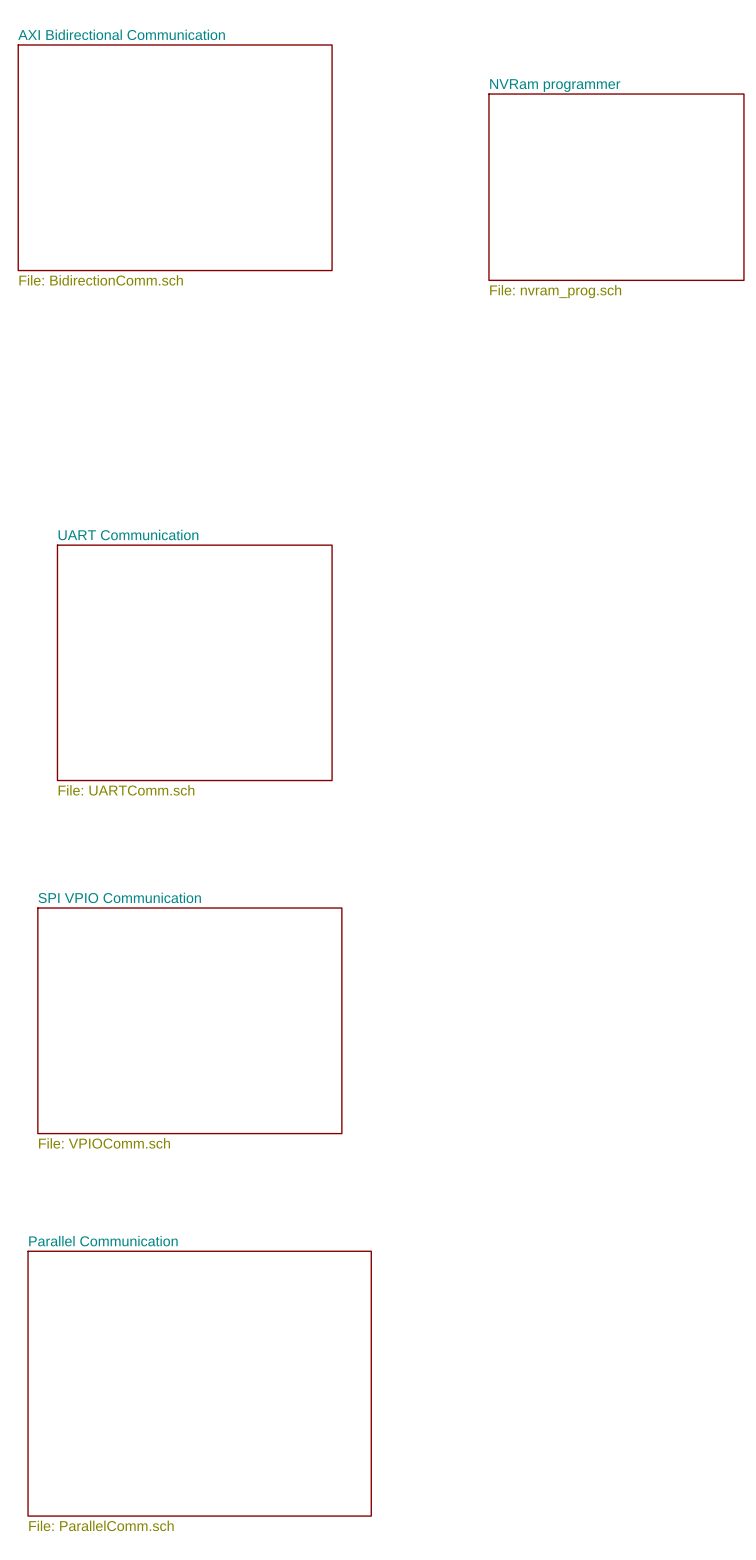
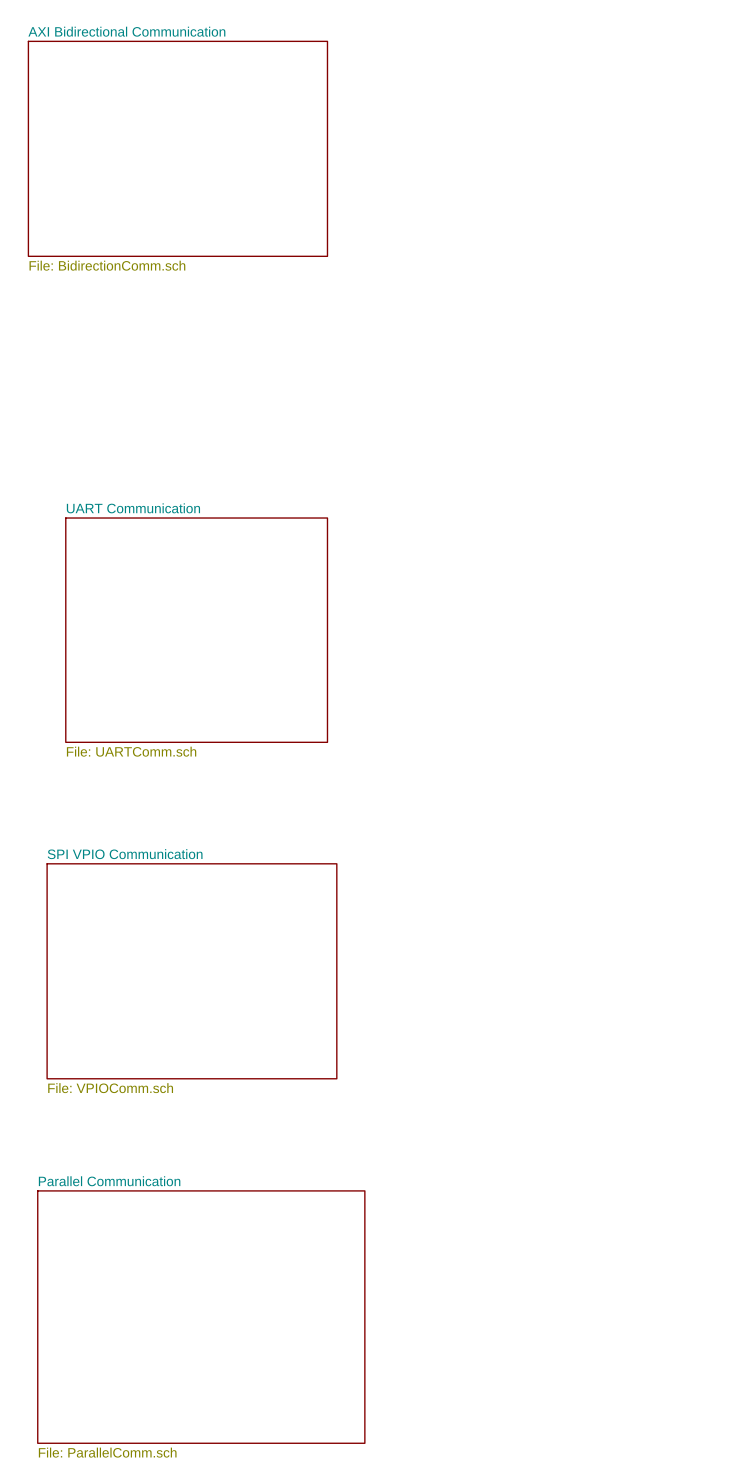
sheet NVRam programmer: File: nvram_prog.sch (616, 187) -> none

